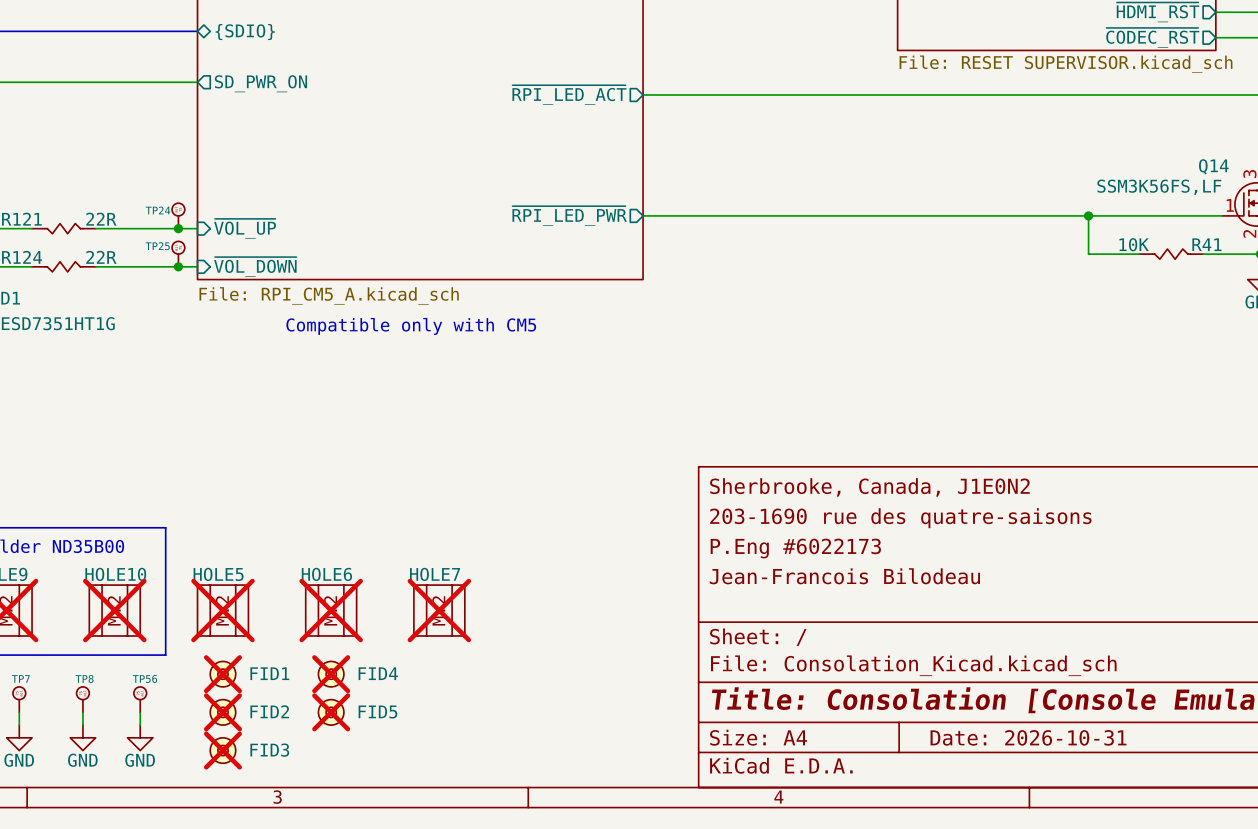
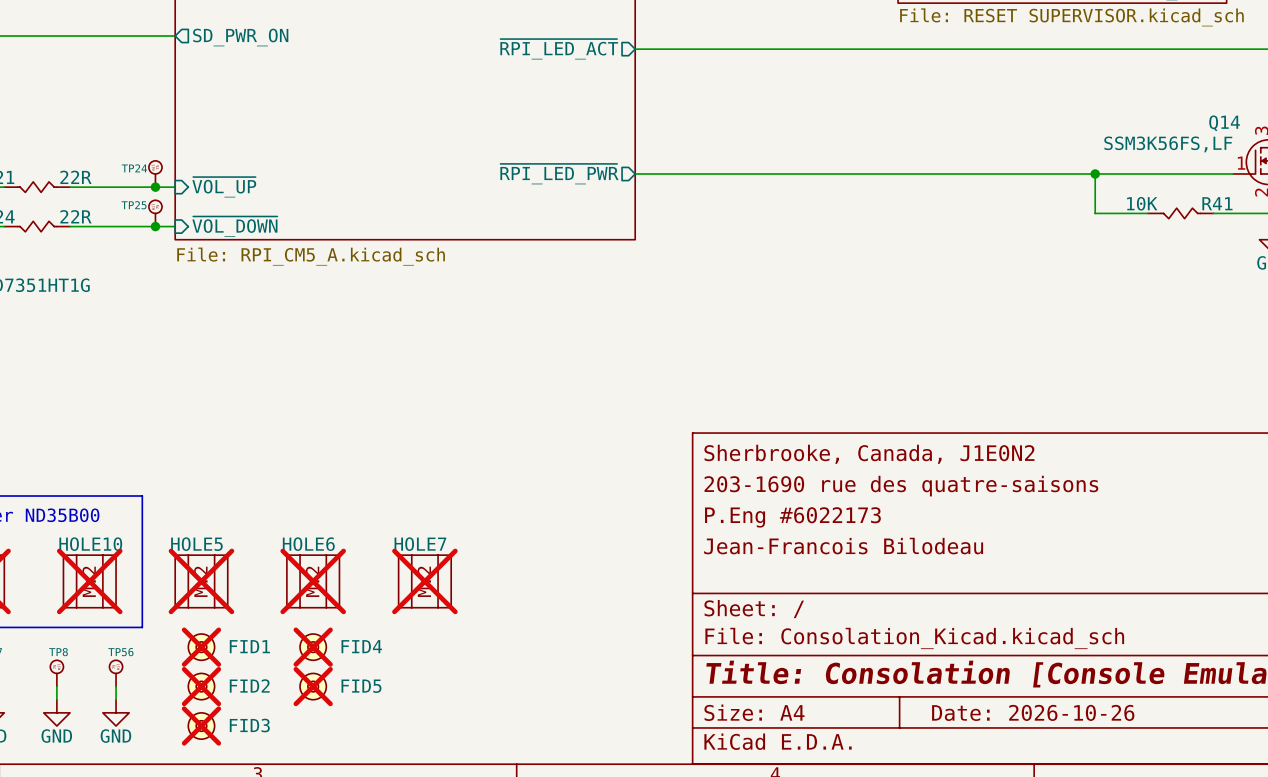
text: Compatible only with CM5 (411, 326) -> none
title block: Date: 2026-10-31 (1028, 737) -> Date: 2026-10-26 (1033, 712)

